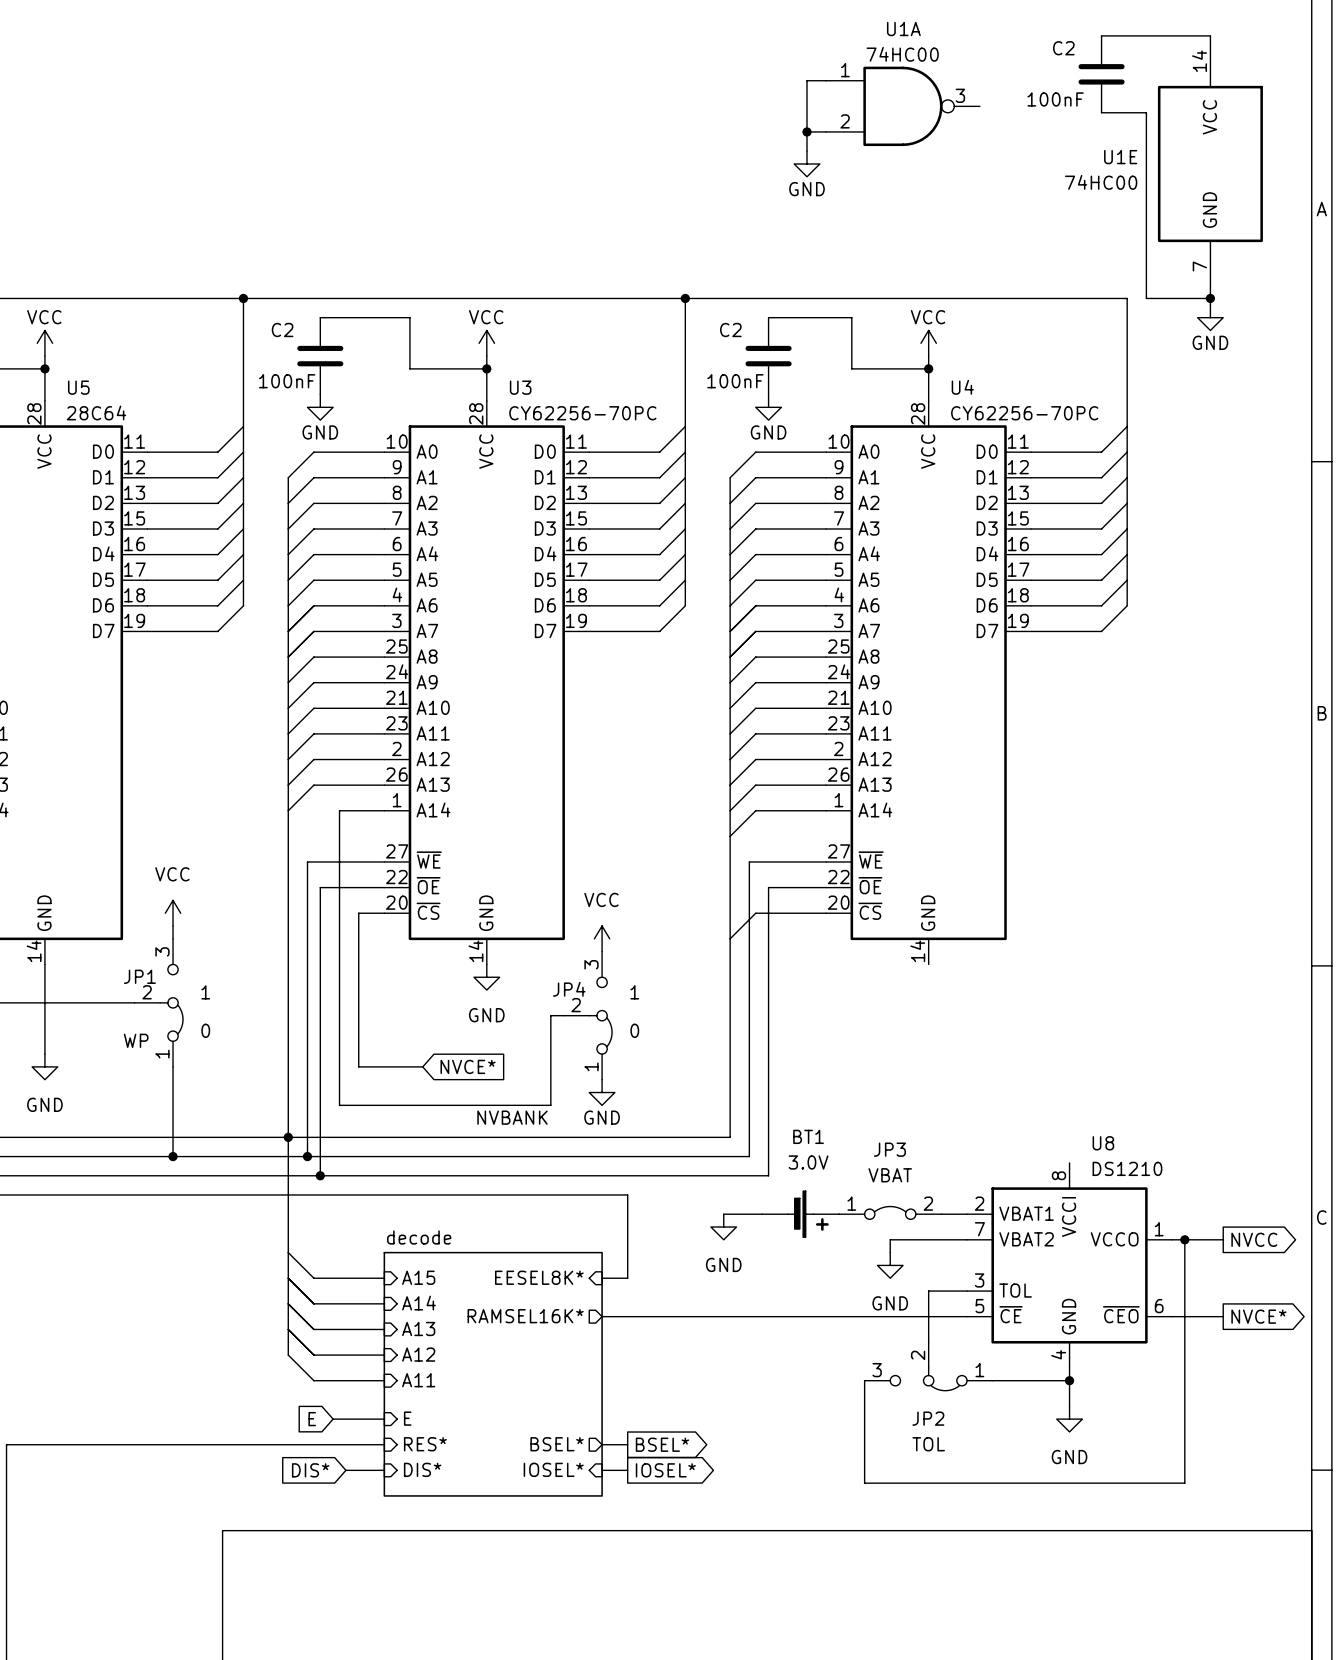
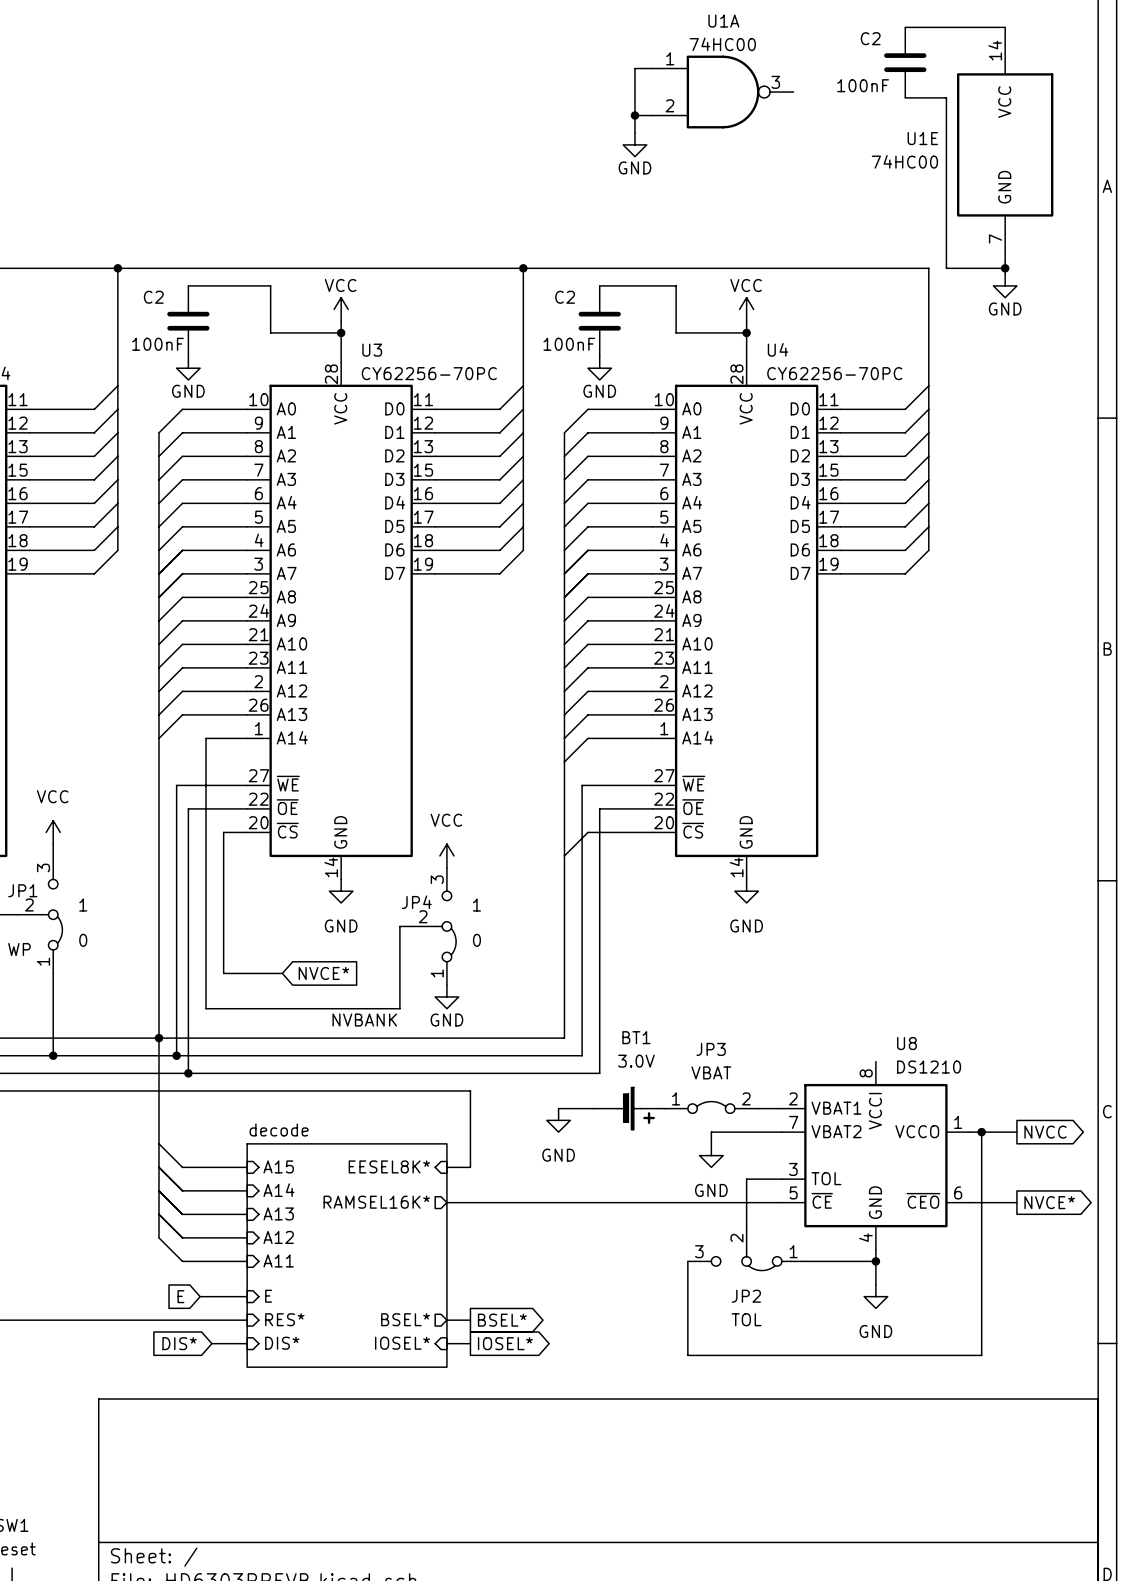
power symbol: none -> GND (746, 891)

